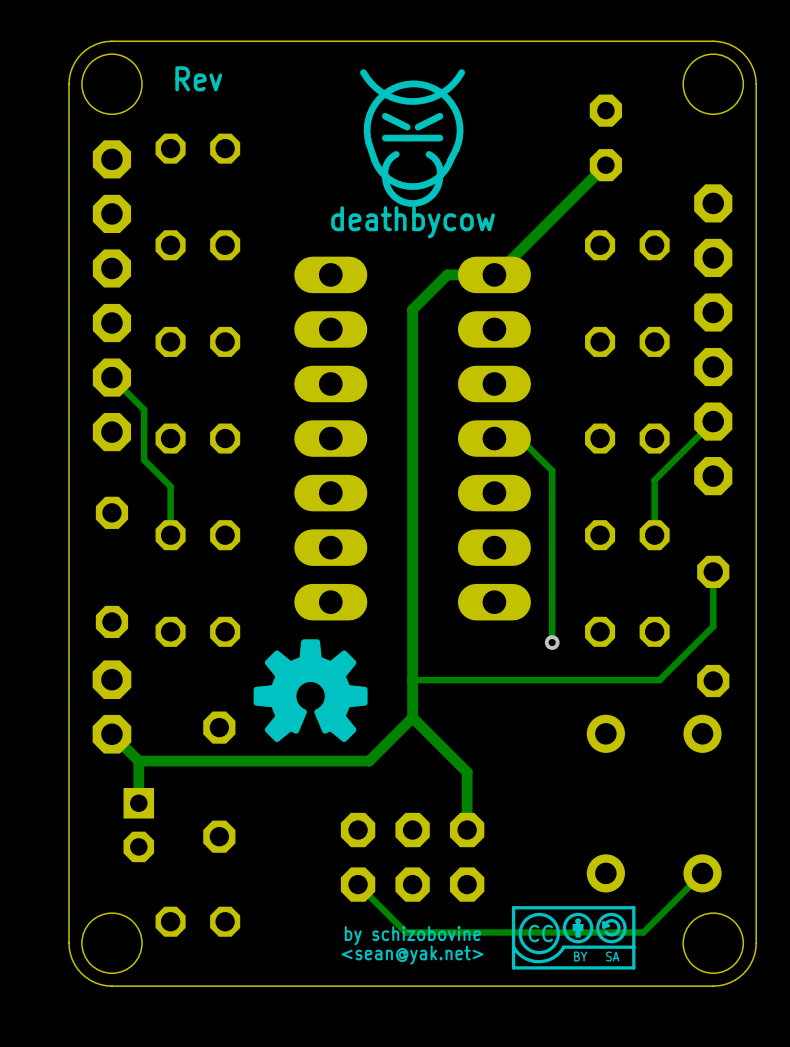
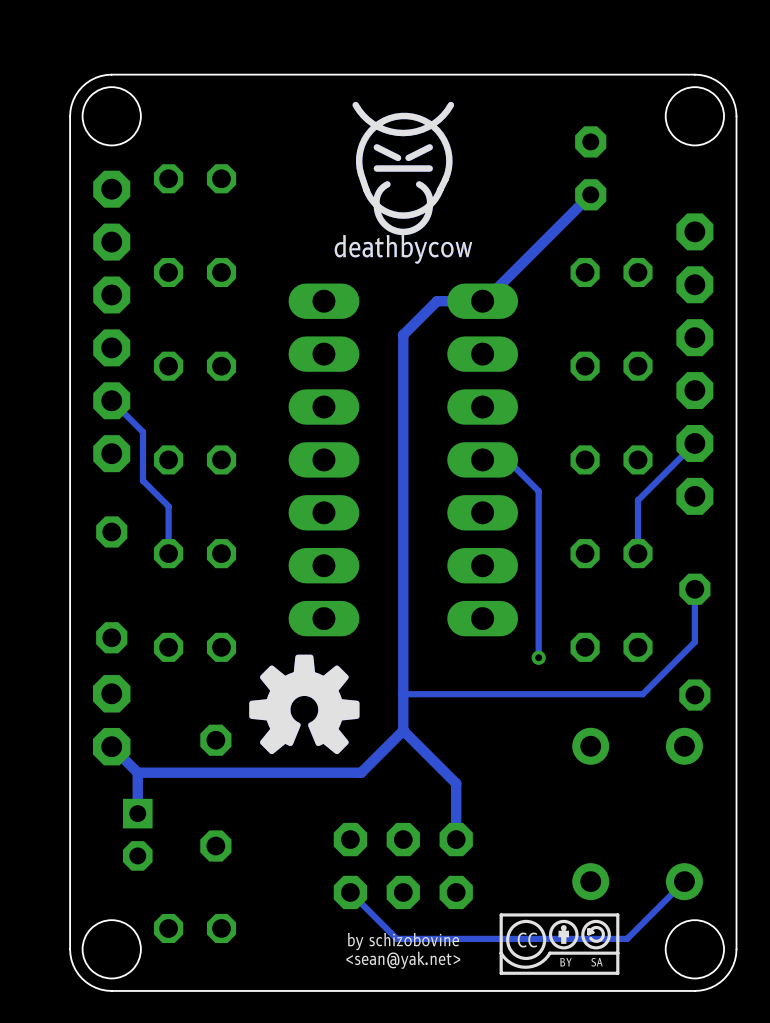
text: Rev (198, 78) -> none

